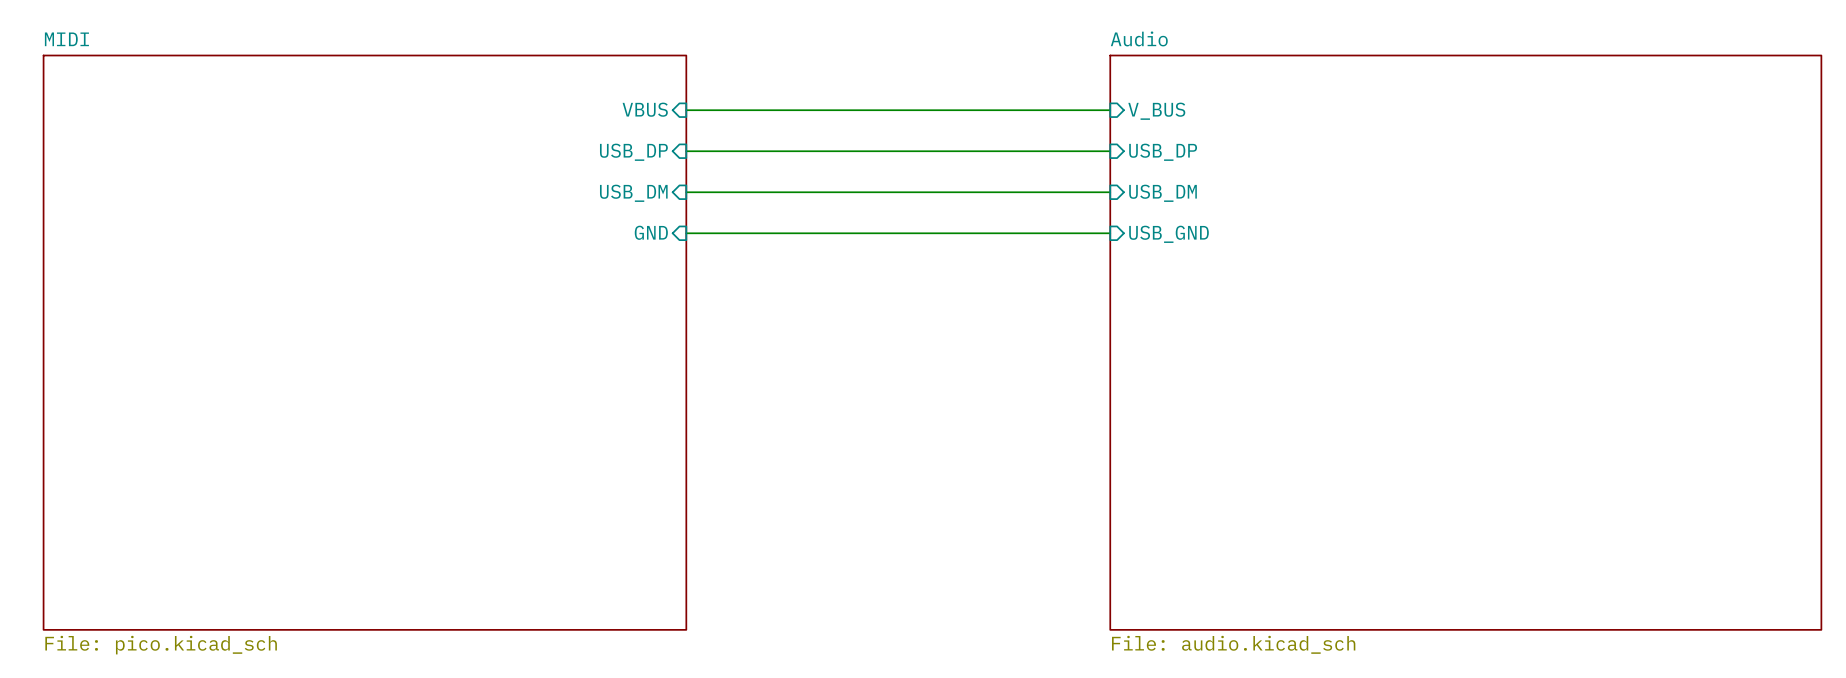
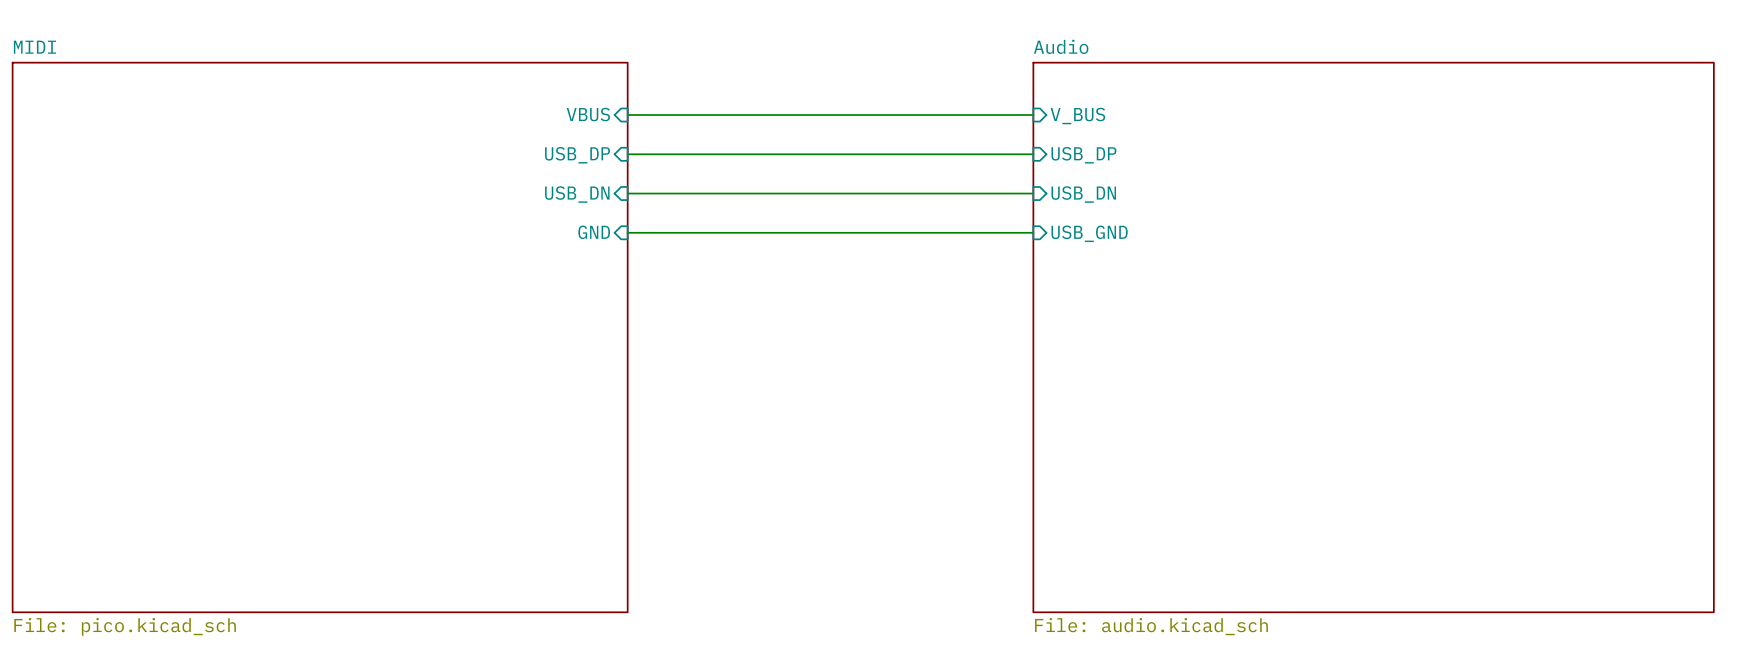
sheet pin: USB_DM (633, 193) -> USB_DN (577, 194)
sheet pin: USB_DM (1163, 193) -> USB_DN (1083, 194)

